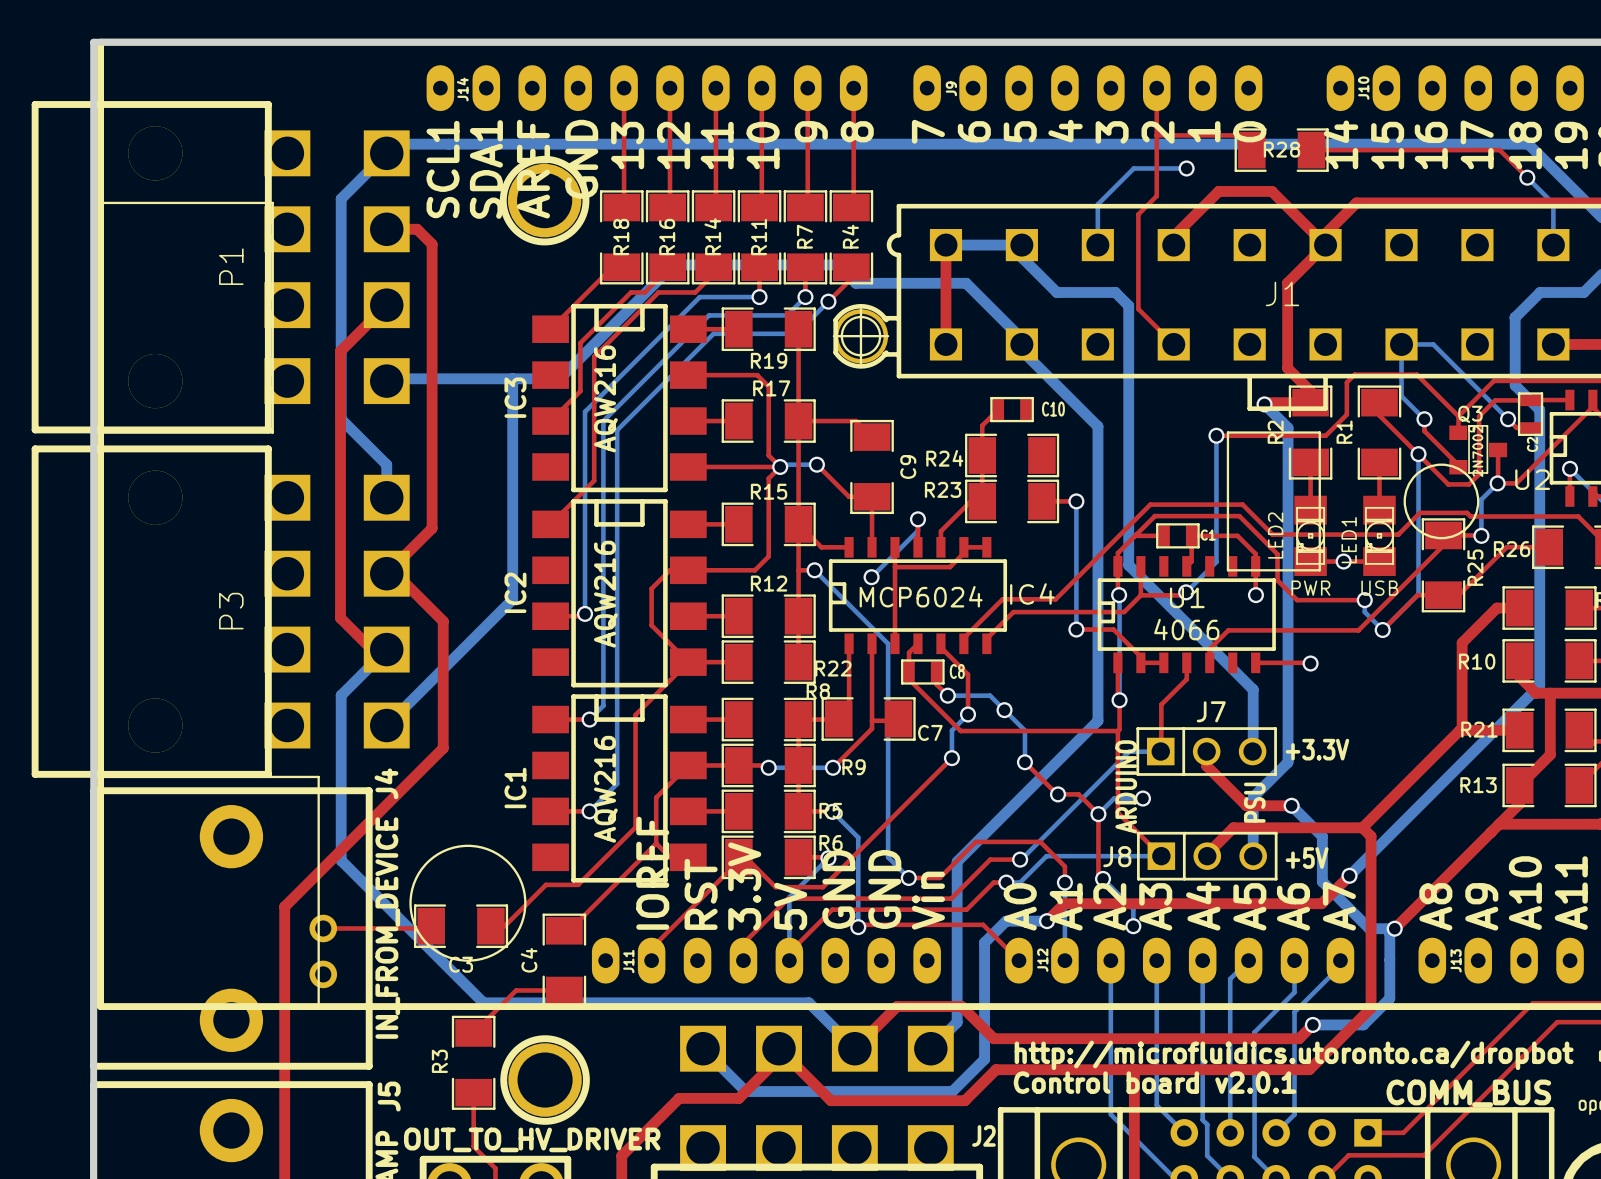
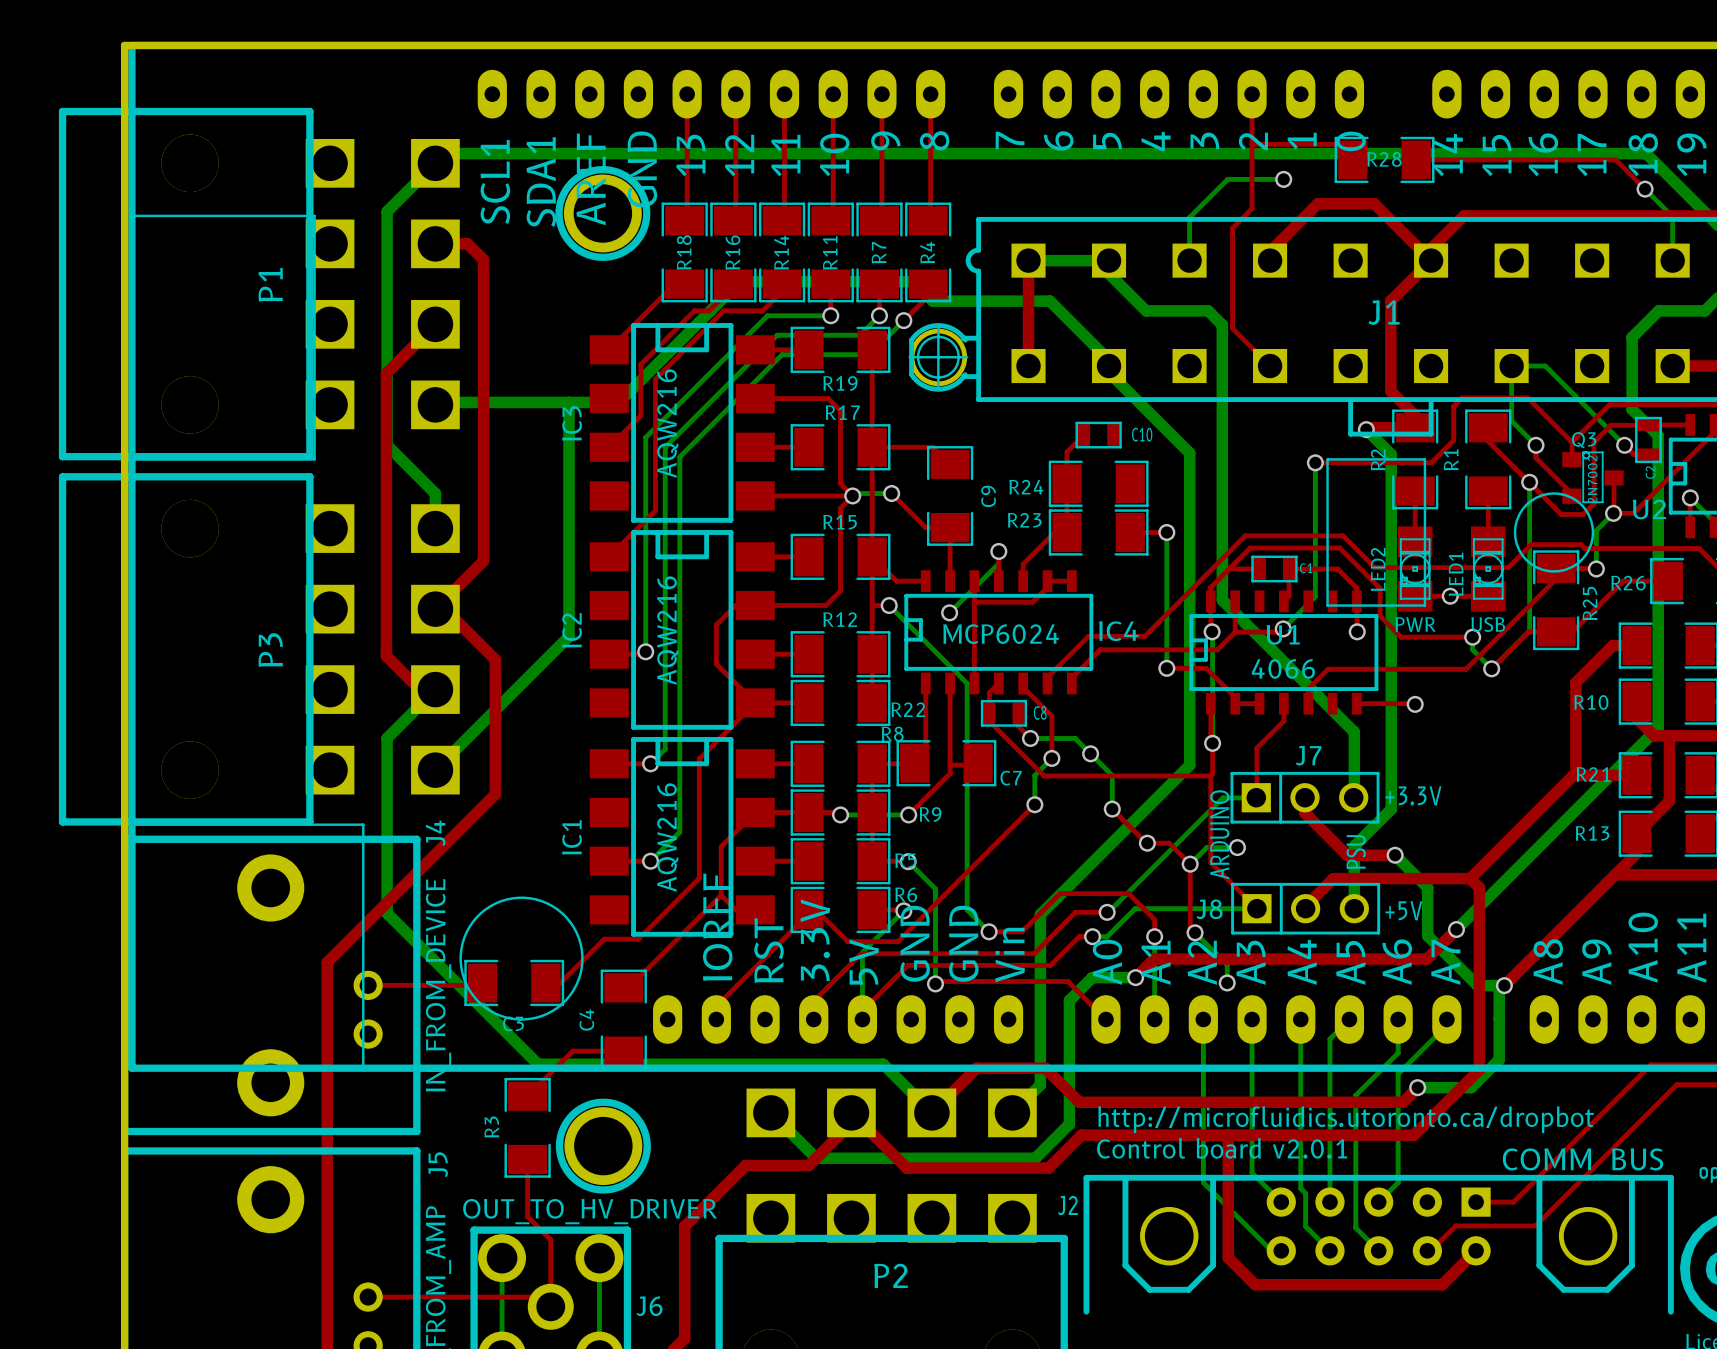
text: J9 (951, 88) -> none
text: J10 (1363, 88) -> none
text: J14 (462, 89) -> none
text: J12 (1042, 960) -> none
text: J13 (1456, 960) -> none
text: J11 (628, 961) -> none

